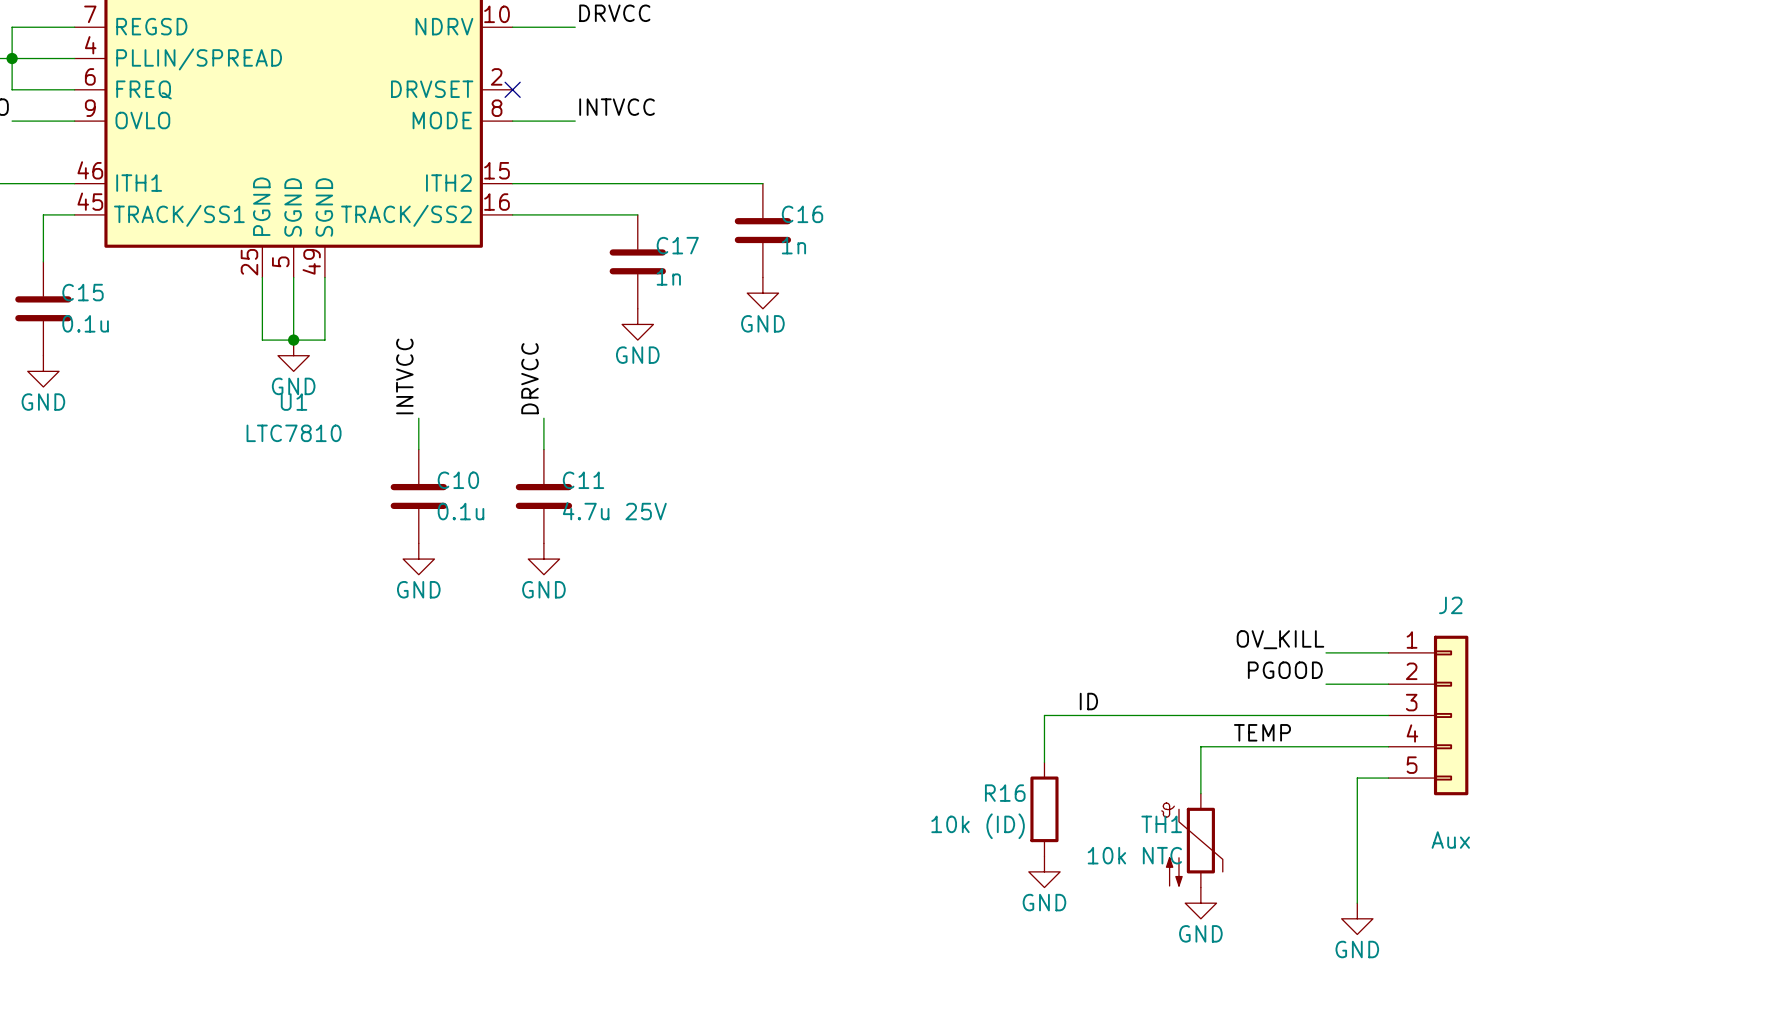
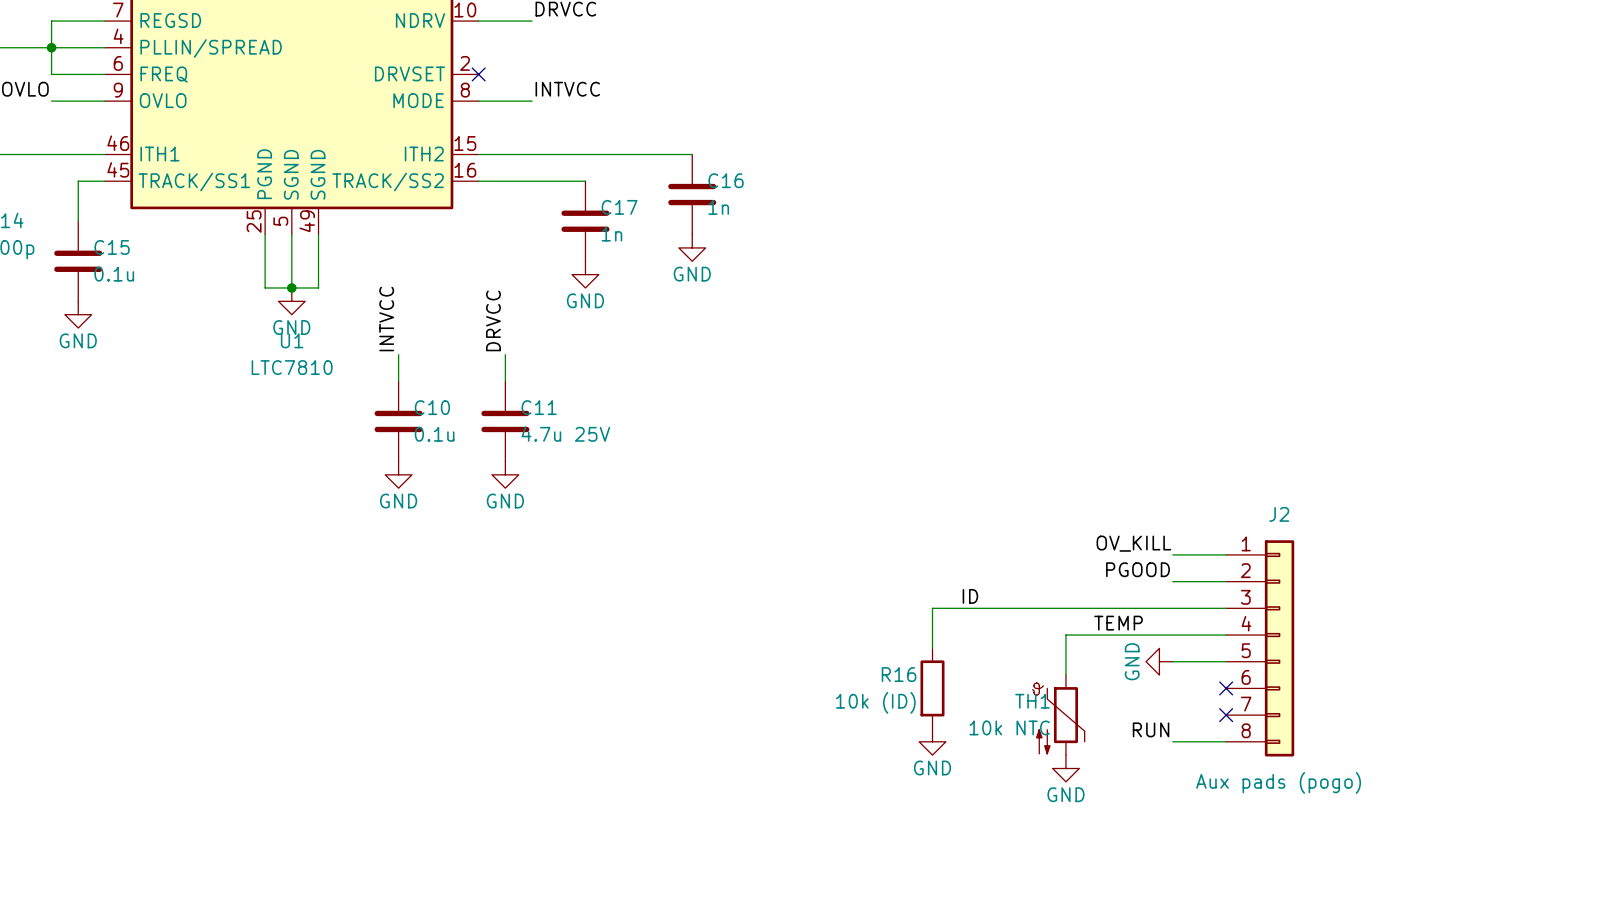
J2 symbol: [1388, 635, 1469, 796] -> [1226, 540, 1295, 757]
wire: (1357, 778) (1357, 903) -> (1199, 661) (1172, 661)
no-connect mark: none -> (1226, 688)
no-connect mark: none -> (1226, 715)
J2 value: Aux (1450, 840) -> Aux pads (pogo) (1278, 782)
label: none -> RUN (1151, 729)
wire: none -> (1172, 741) (1226, 741)
power symbol rotation: 0° (1357, 918) -> 90° clockwise (1159, 661)
power symbol position: GND (1357, 918) -> GND (1159, 661)

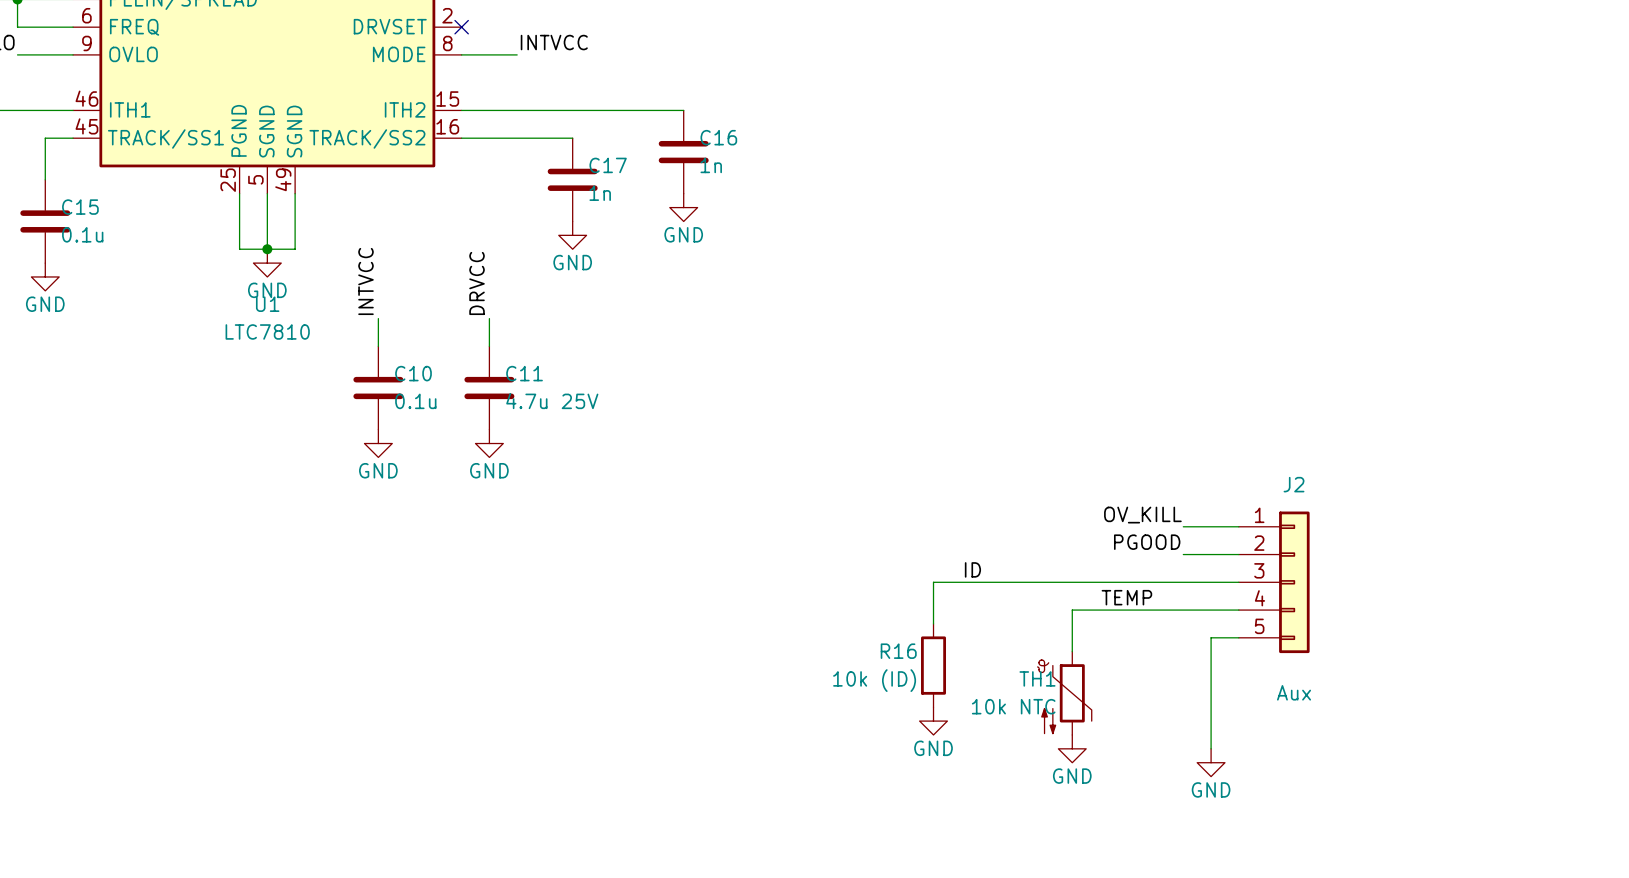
J2 symbol: [1226, 540, 1295, 757] -> [1238, 511, 1310, 654]
power symbol rotation: 0° (1159, 661) -> 90° counterclockwise (1211, 762)
power symbol position: GND (1159, 661) -> GND (1211, 762)
wire: (1172, 661) (1199, 661) -> (1211, 748) (1211, 637)
no-connect mark: (1226, 688) -> none
no-connect mark: (1226, 715) -> none
label: RUN (1151, 729) -> none
wire: (1172, 741) (1226, 741) -> none
J2 value: Aux pads (pogo) (1278, 782) -> Aux (1294, 692)

